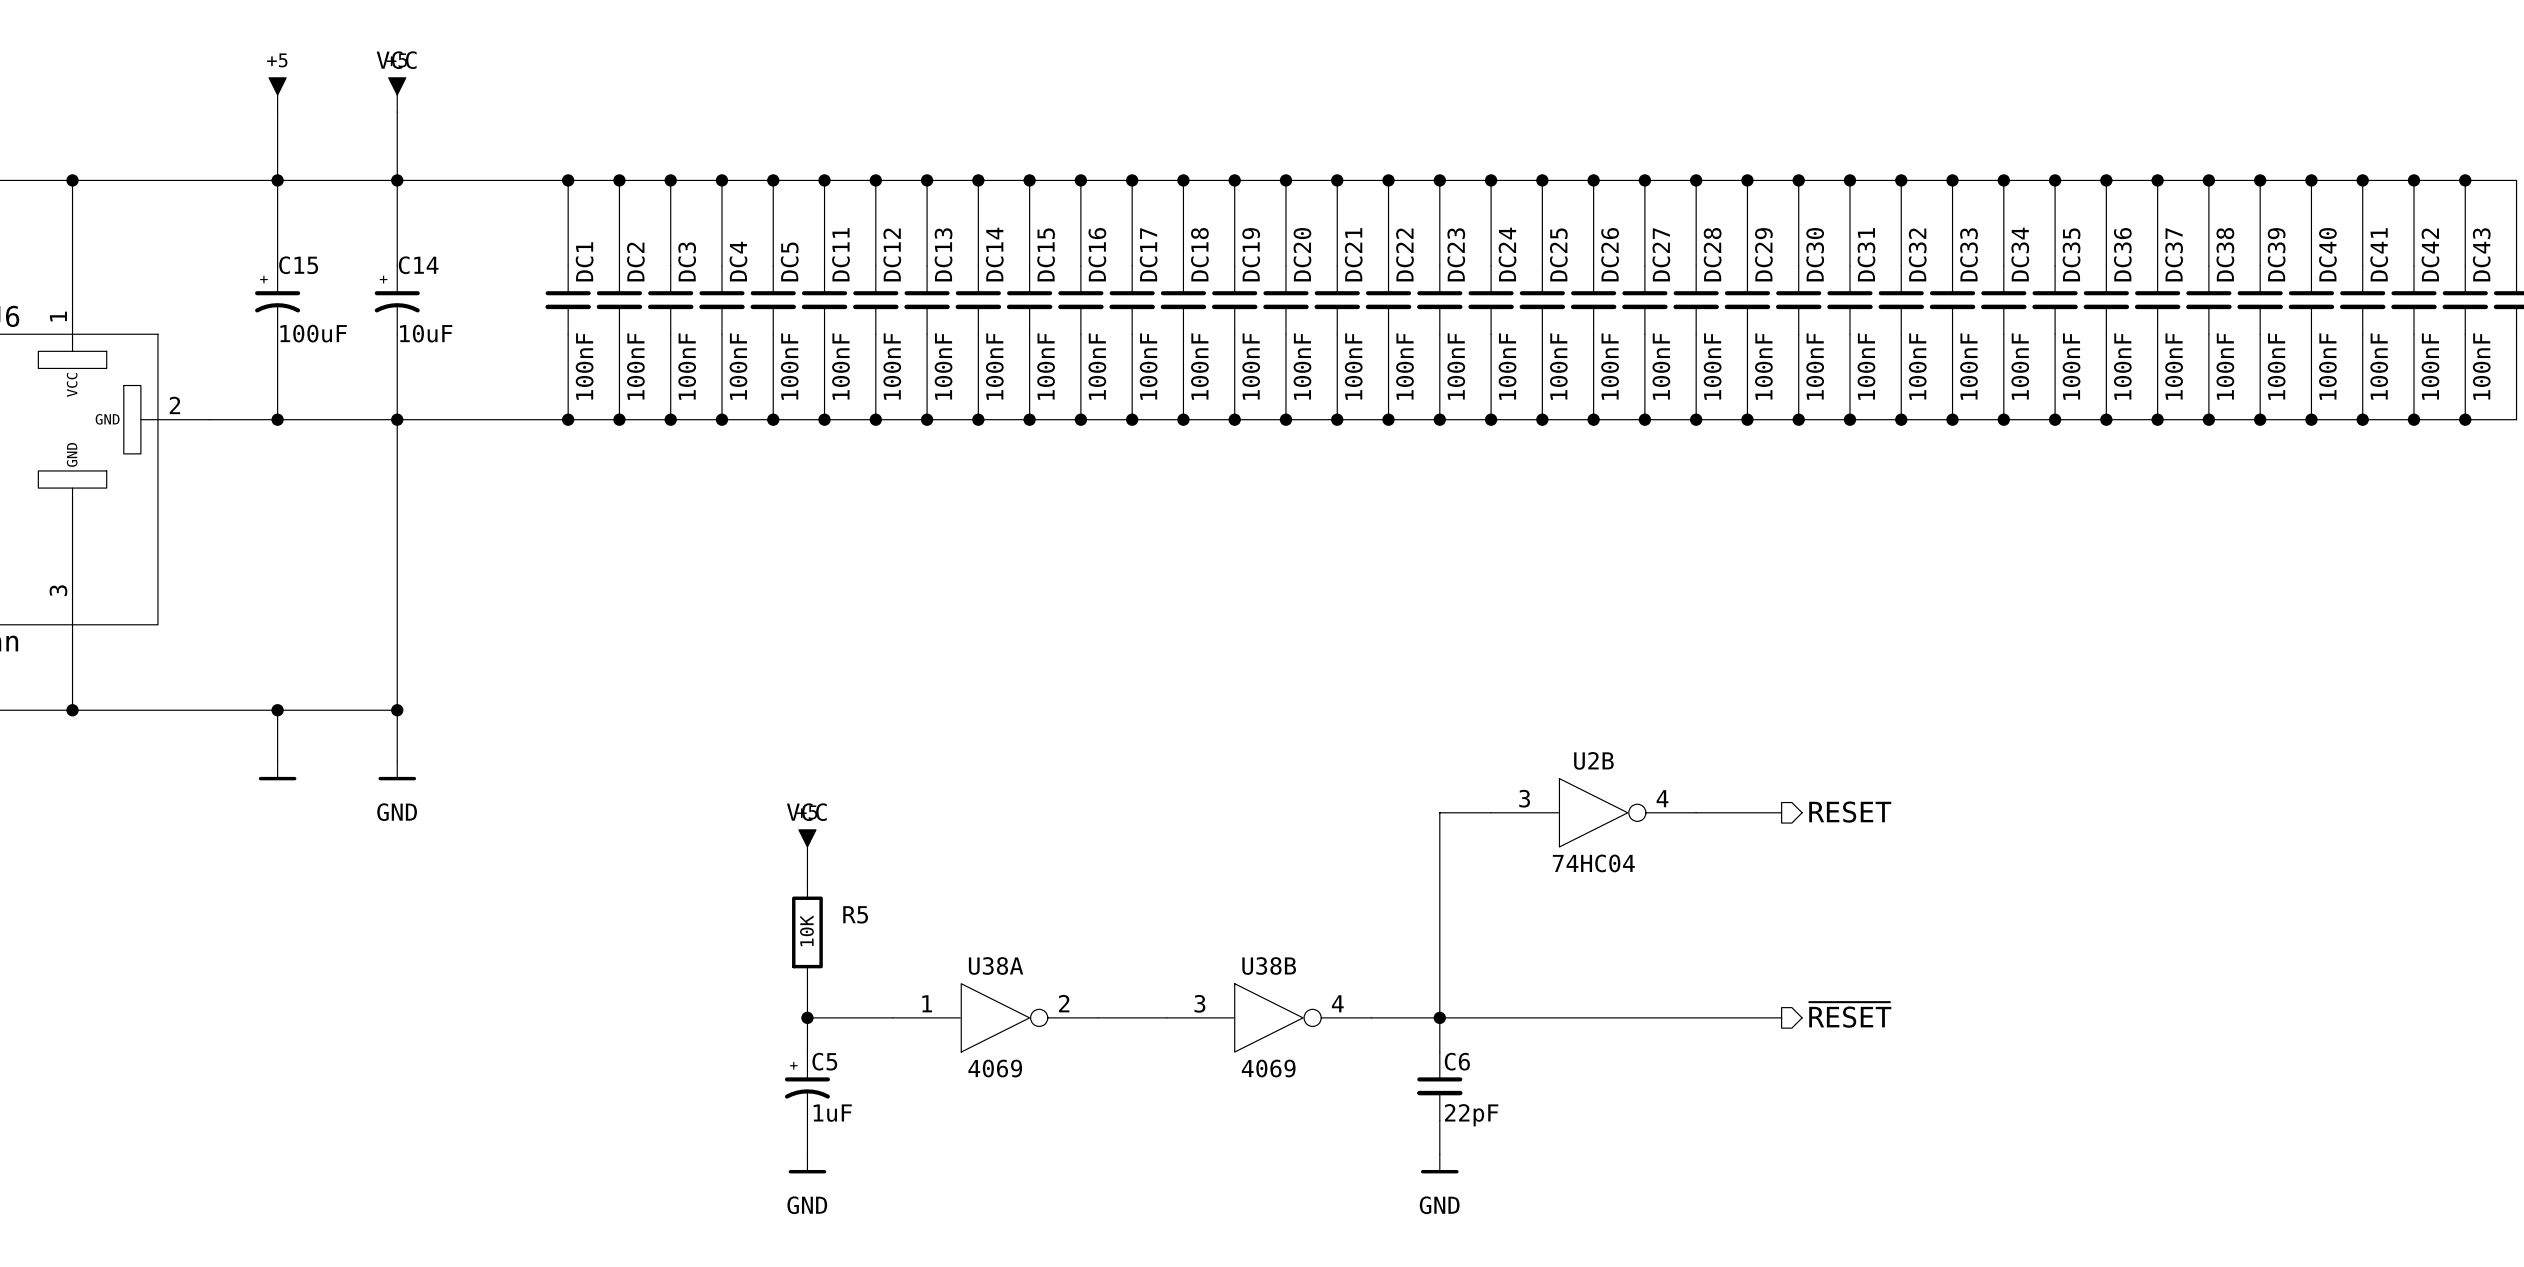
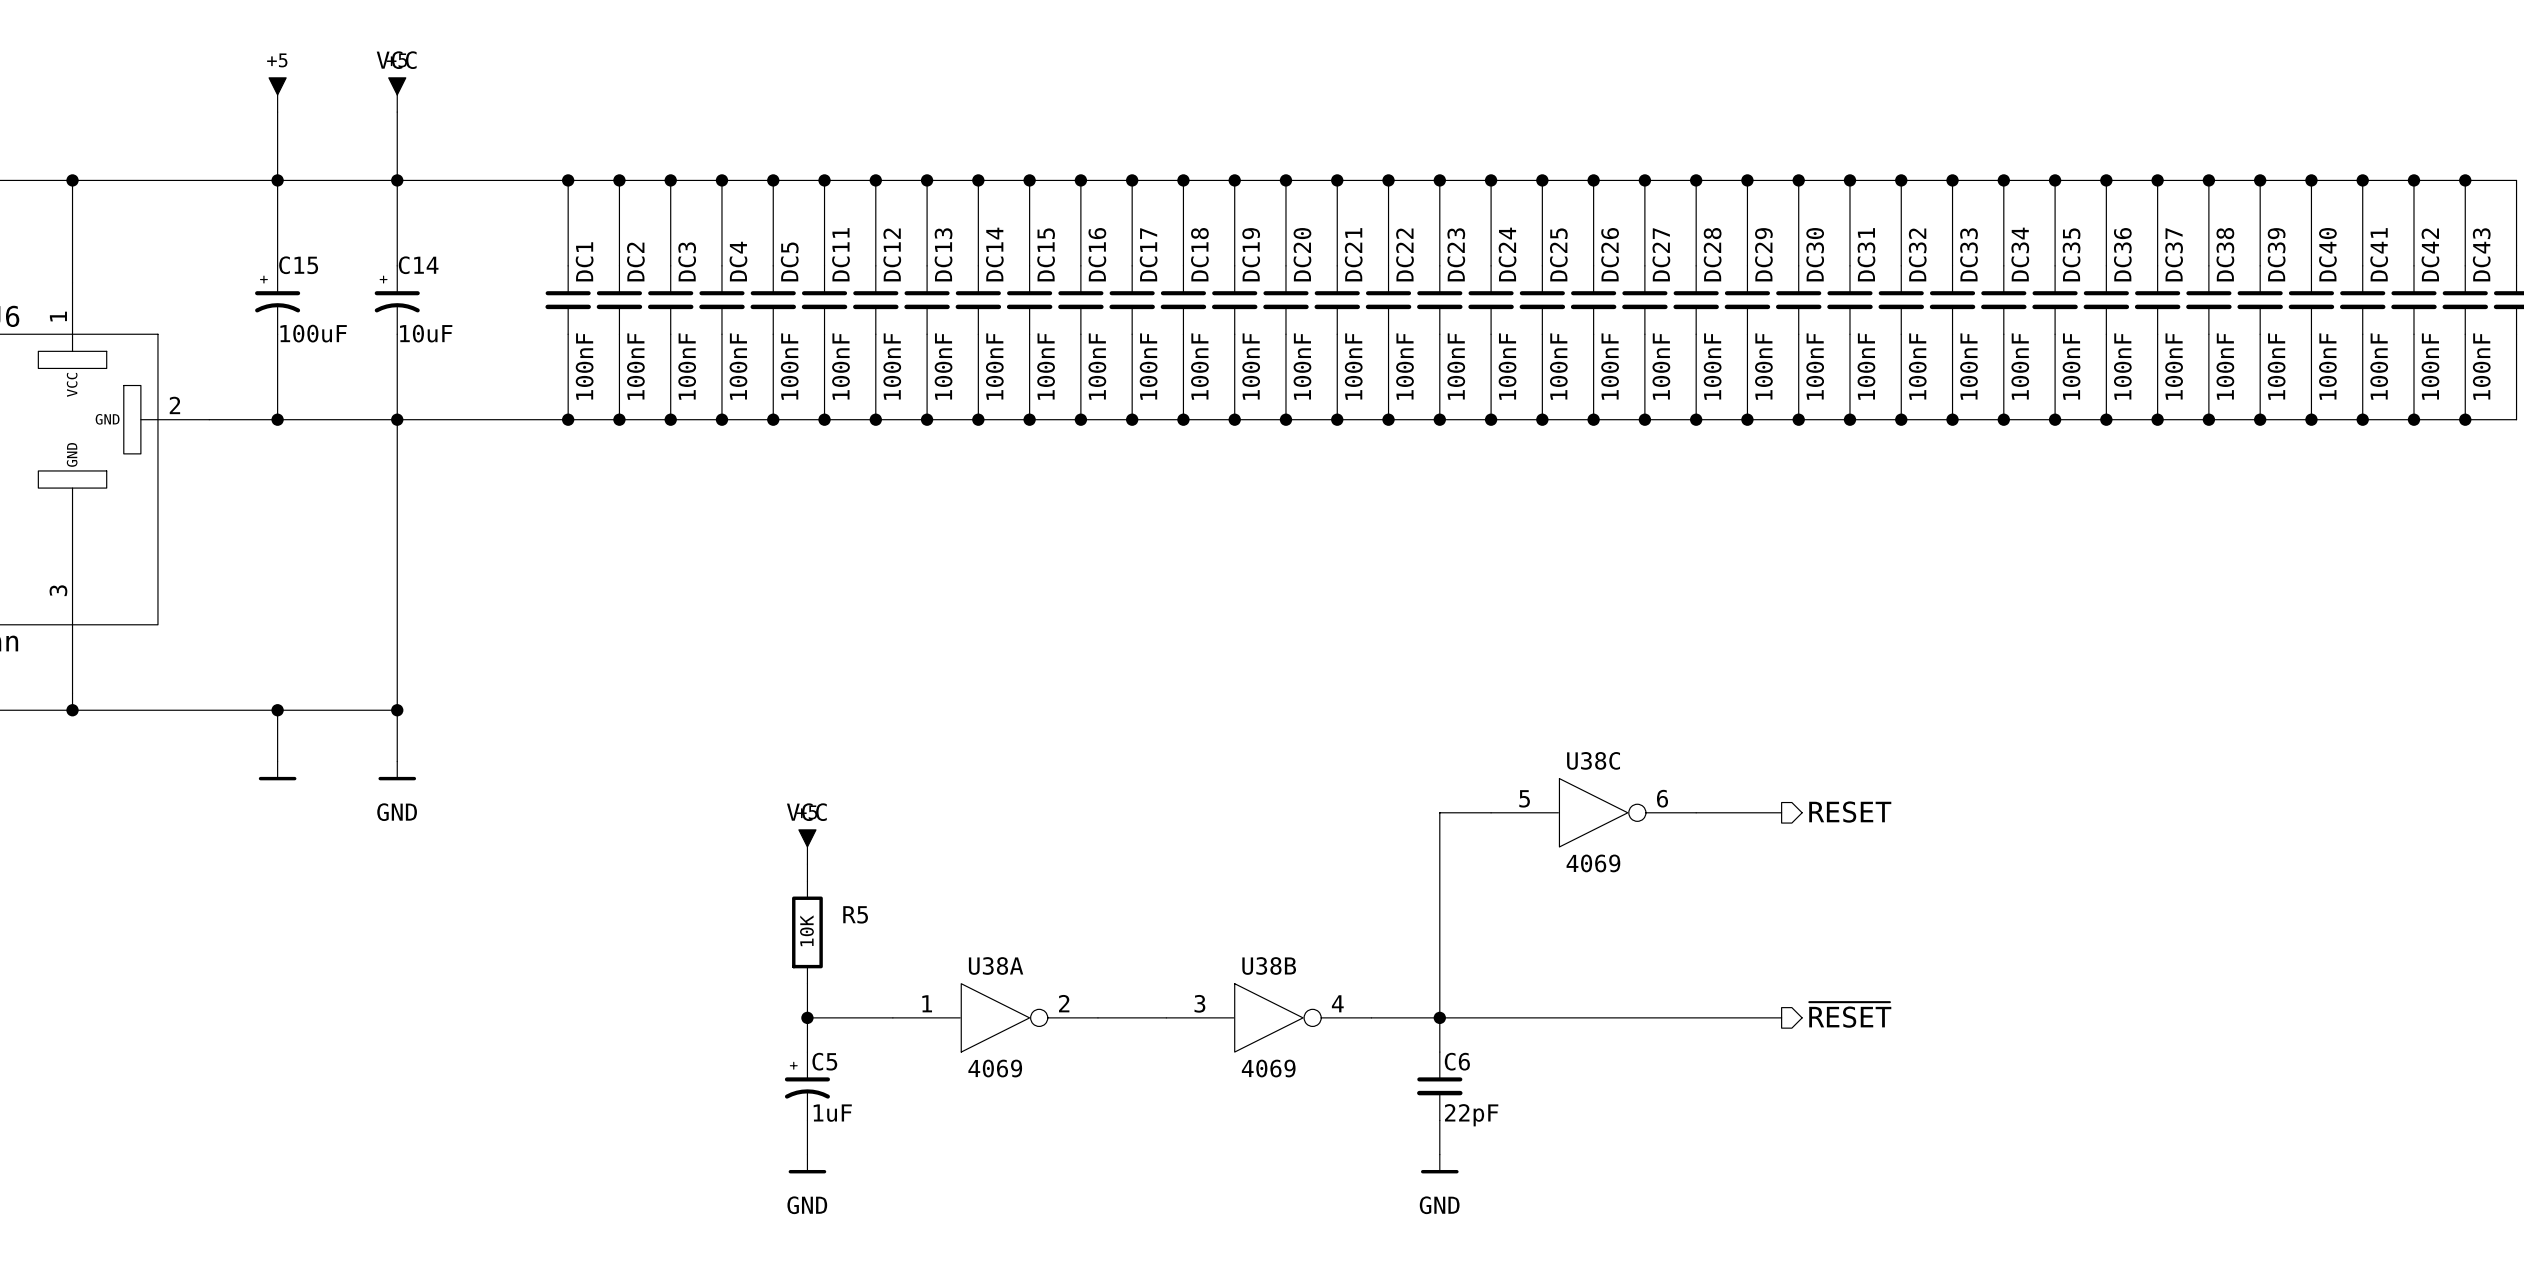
U2B name: U2B (1593, 760) -> U38C (1593, 760)
U2B pin number: 3 (1524, 798) -> 5 (1524, 798)
U2B pin number: 4 (1662, 798) -> 6 (1662, 798)
U2B value: 74HC04 (1593, 863) -> 4069 (1593, 863)

